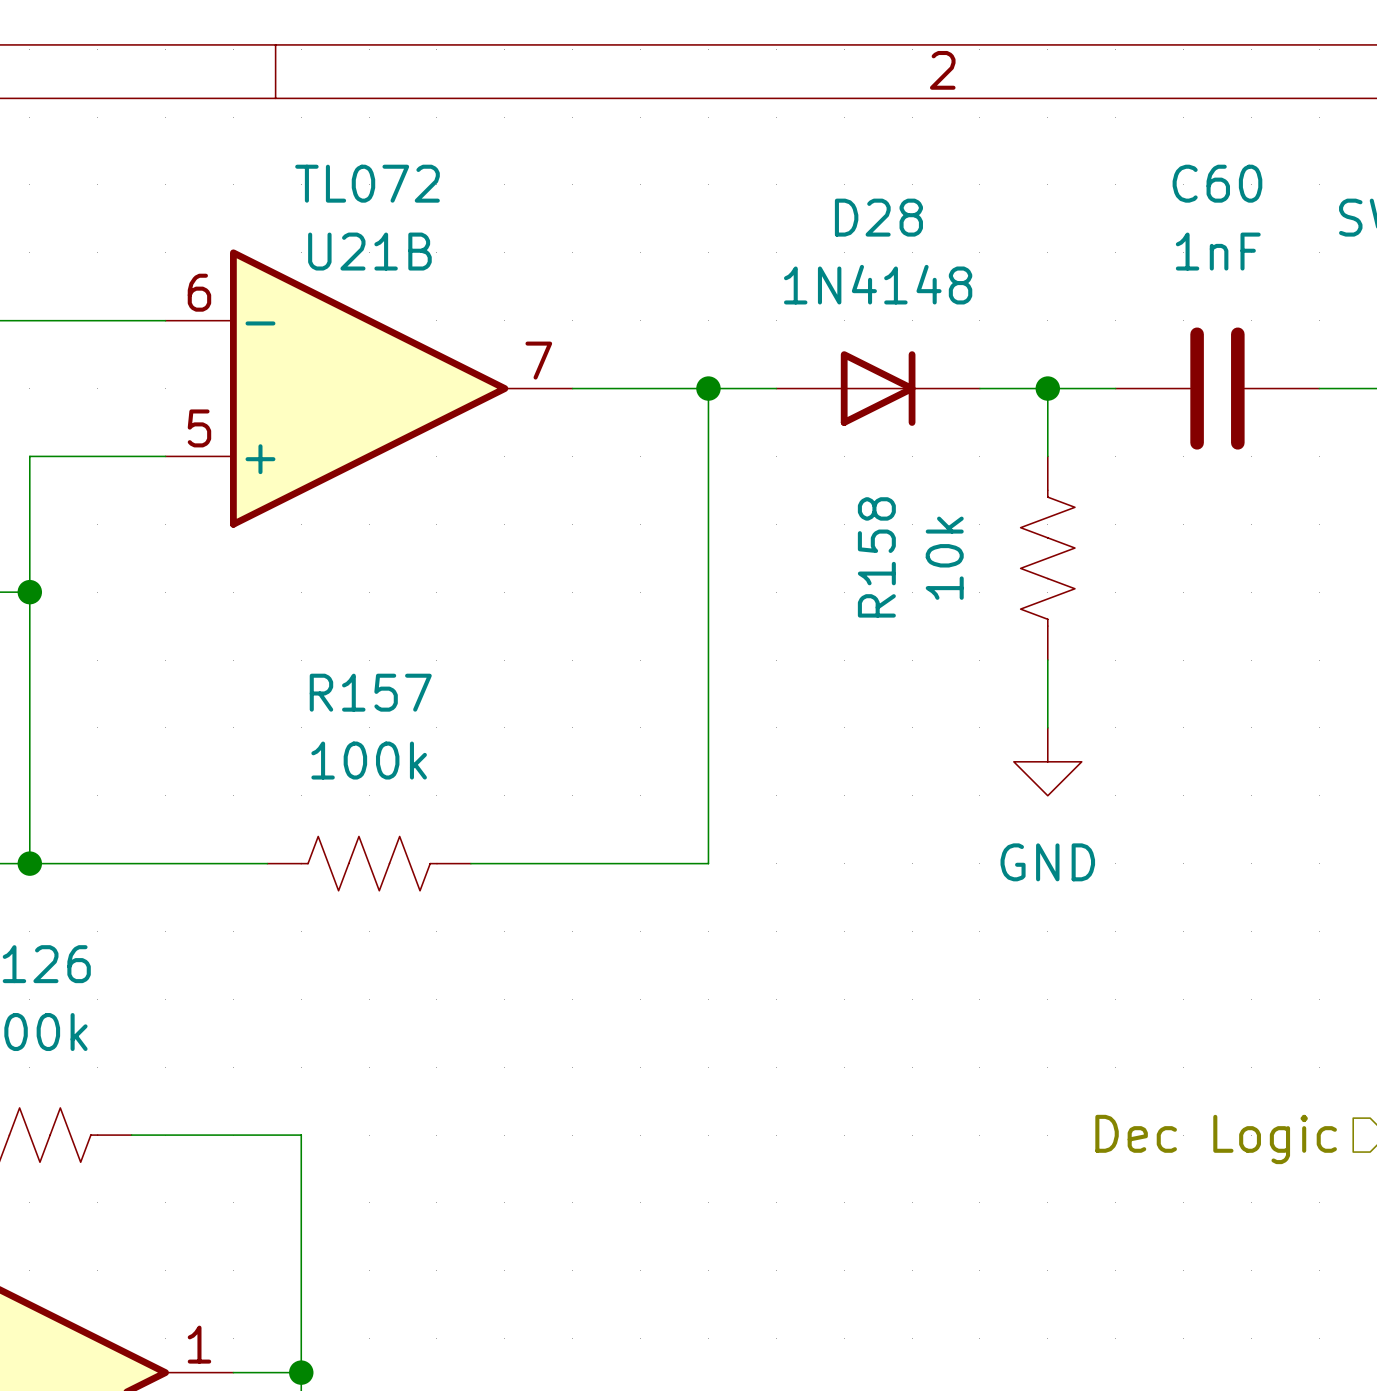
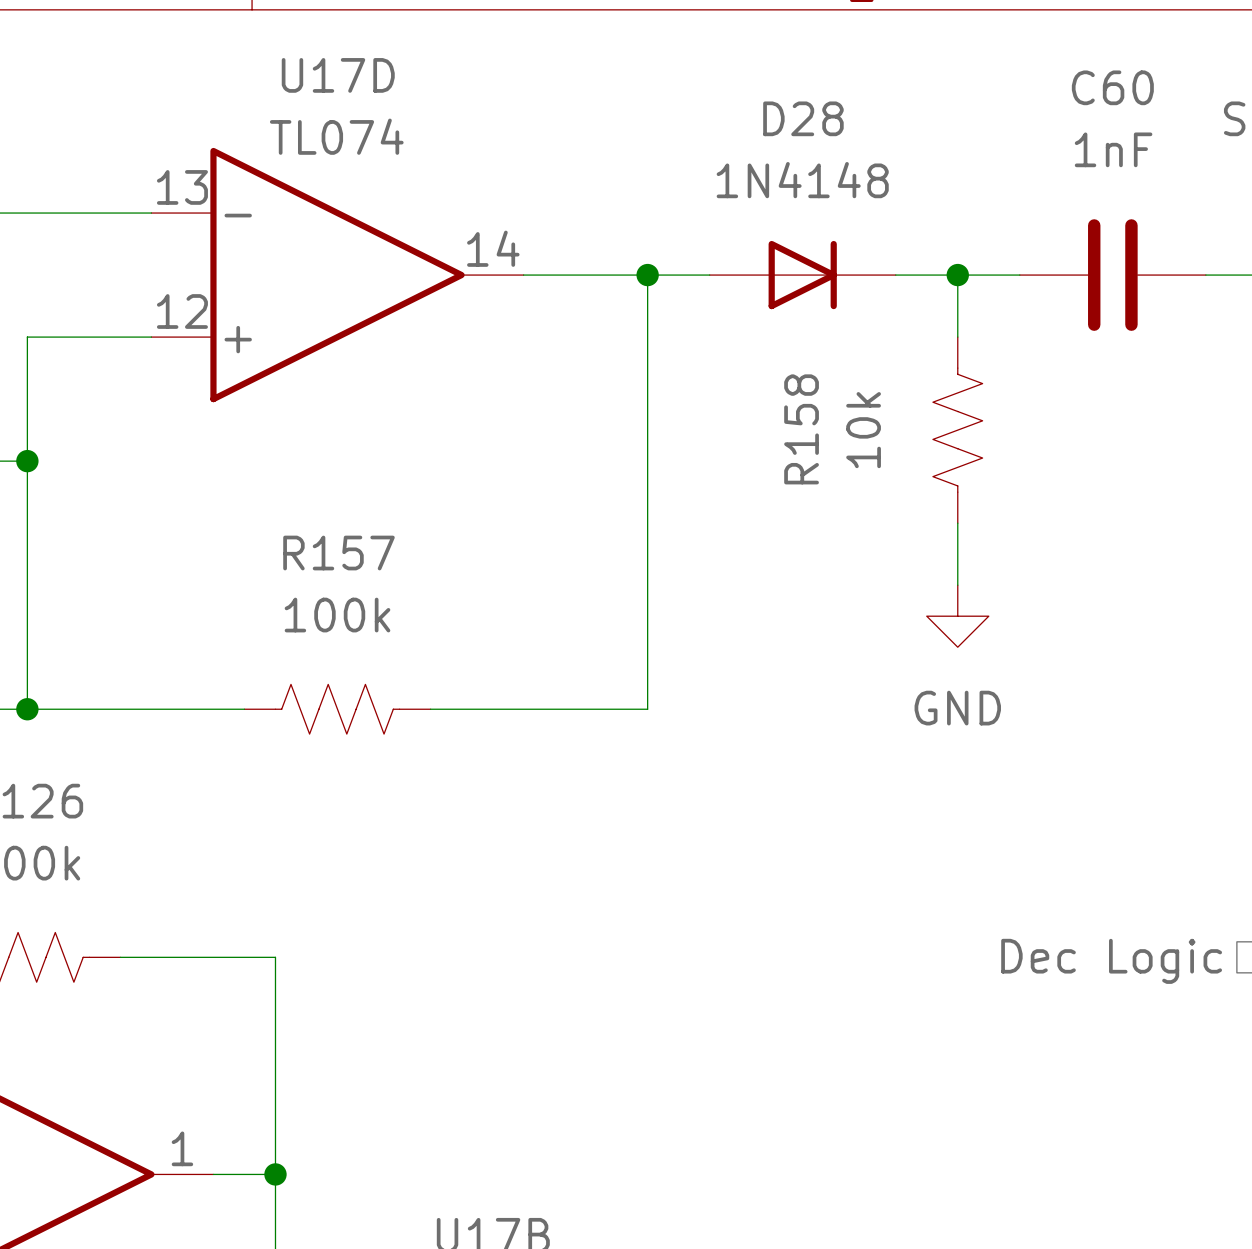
U21B value: TL072 (367, 183) -> TL074 (336, 136)
U21B name: U21B (369, 251) -> U17D (338, 75)
U21B pin number: 6 (199, 292) -> 13 (182, 187)
U21B pin number: 7 (538, 360) -> 14 (493, 248)
U21B pin number: 5 (199, 428) -> 12 (182, 311)

